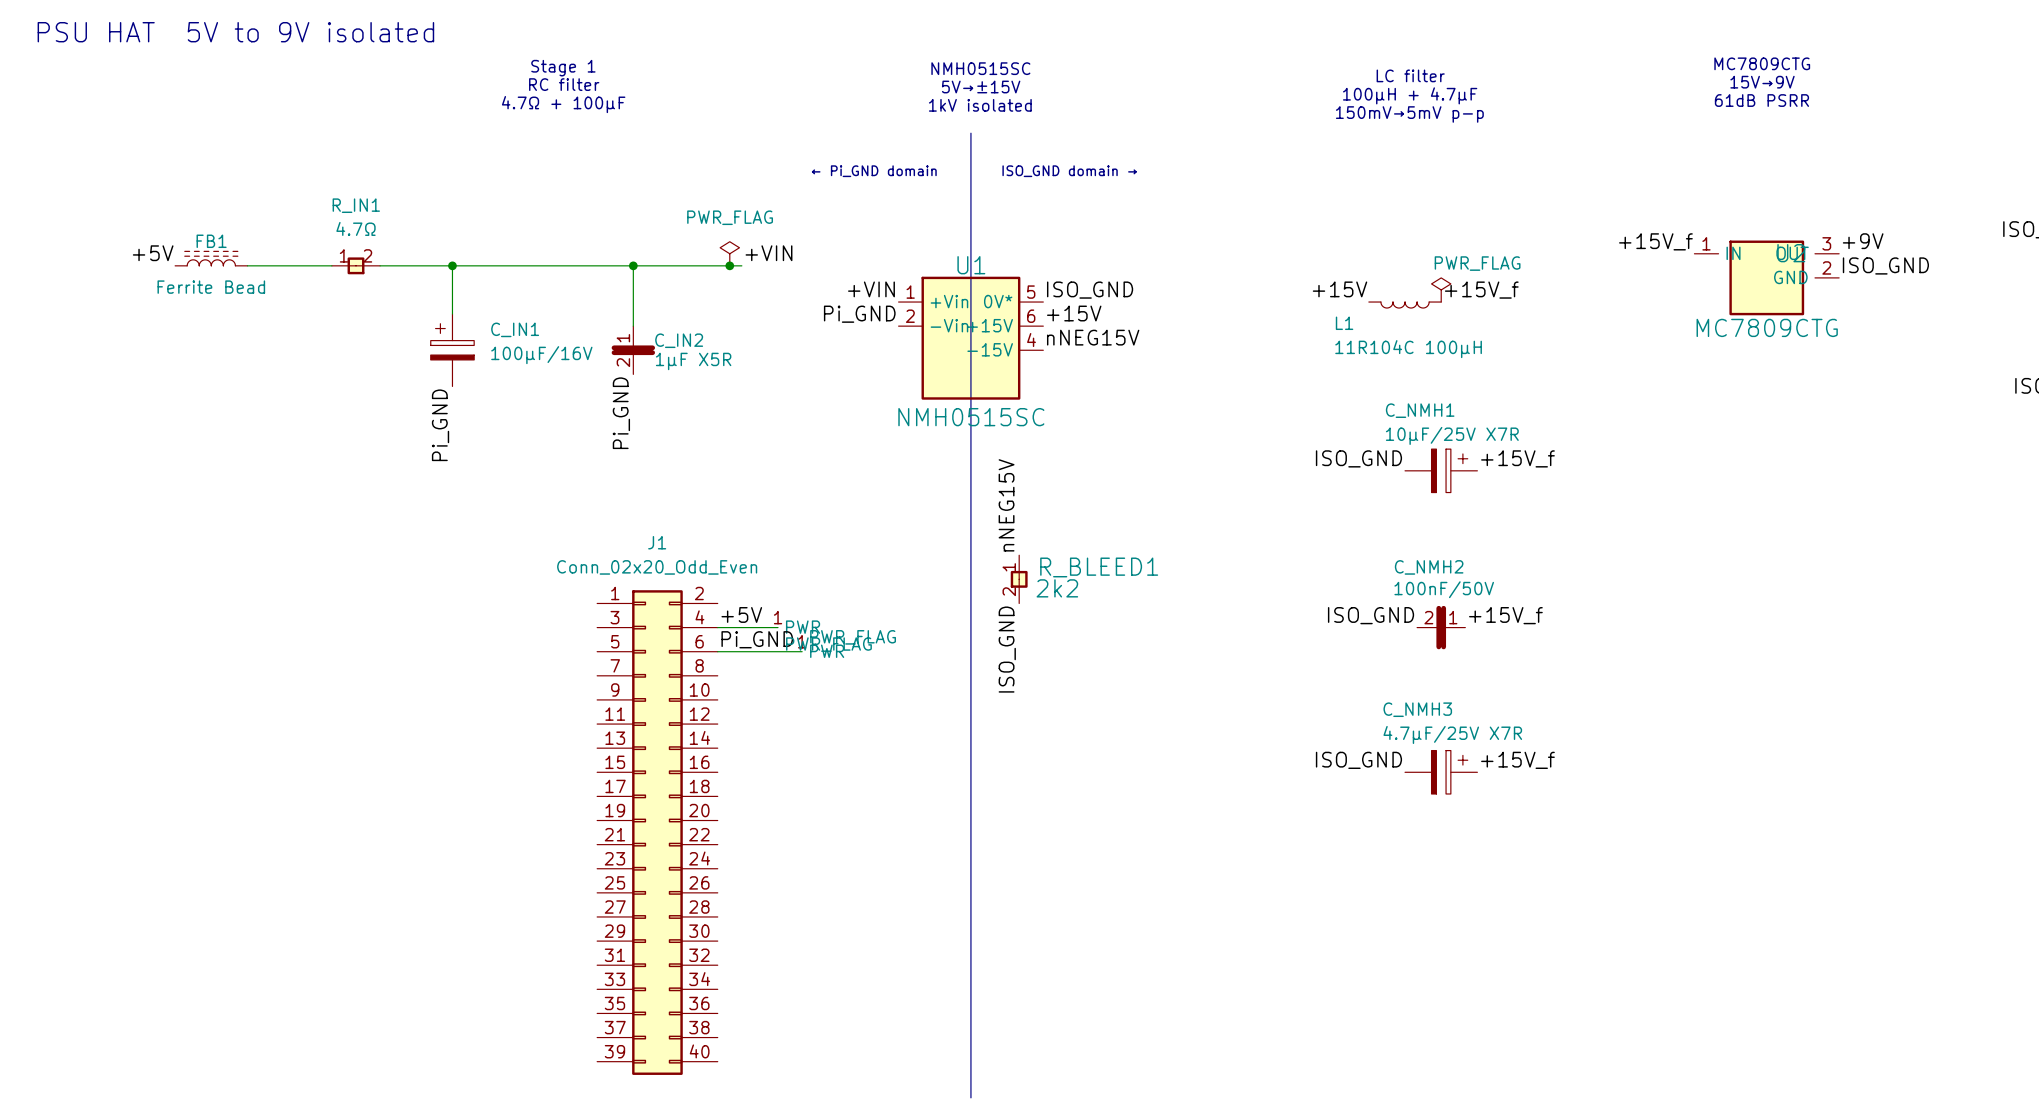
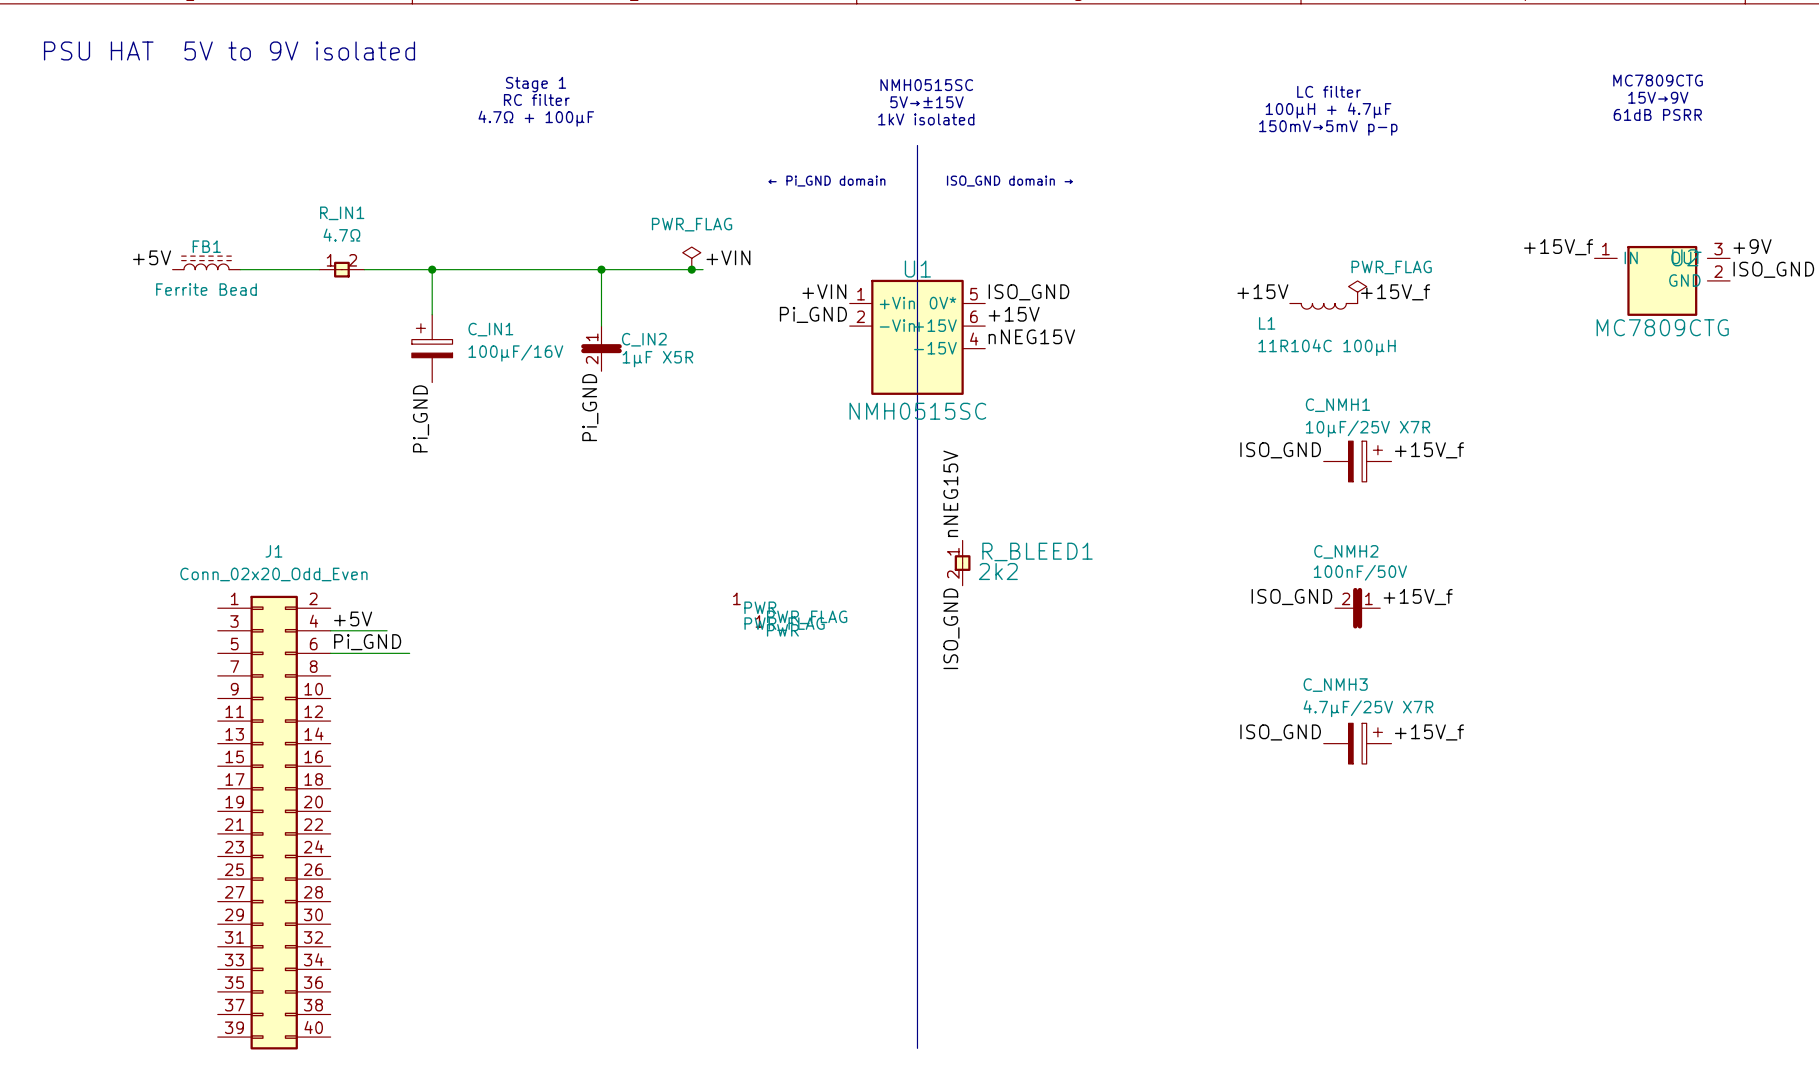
label: +5V (741, 614) -> none
wire: (717, 627) (778, 627) -> none
label: none -> +5V (353, 618)
label: Pi_GND (757, 639) -> none
wire: none -> (330, 630) (387, 630)
wire: (717, 651) (802, 651) -> none
label: none -> Pi_GND (367, 642)
wire: none -> (330, 653) (409, 653)
J1 position: (657, 832) -> (274, 822)

